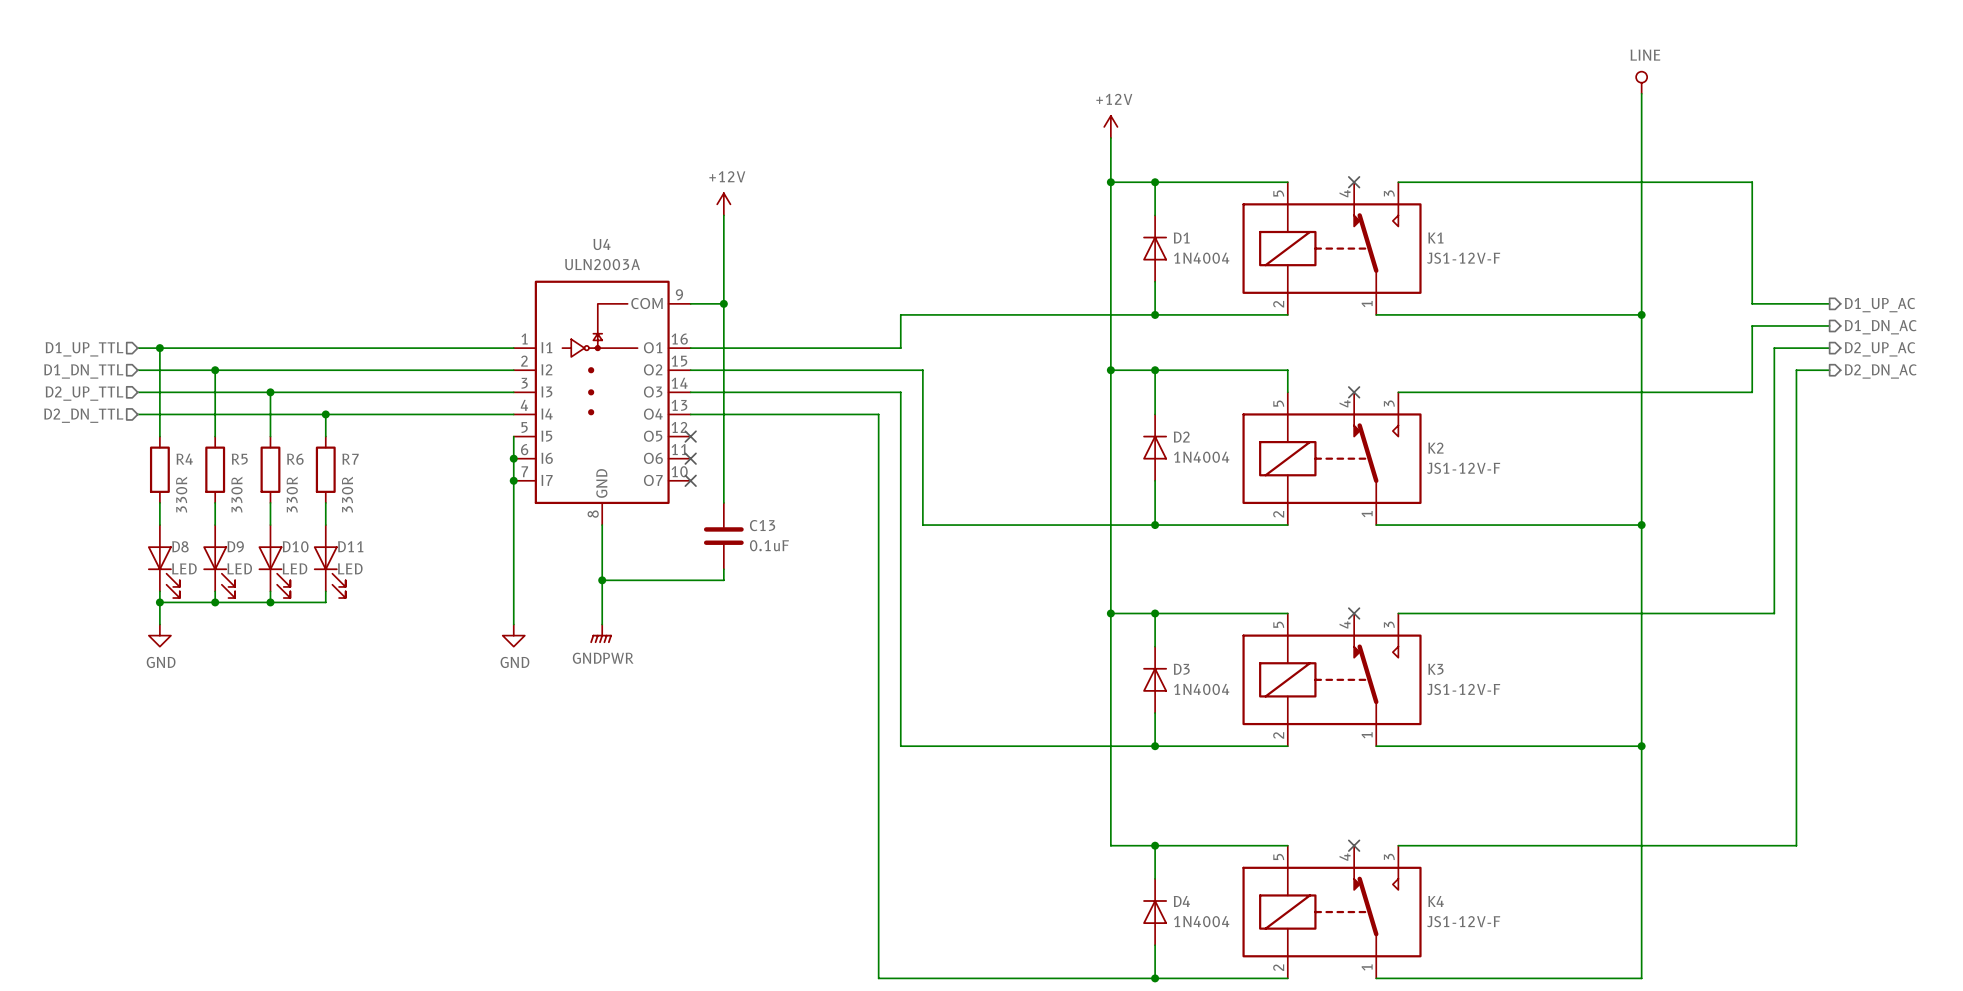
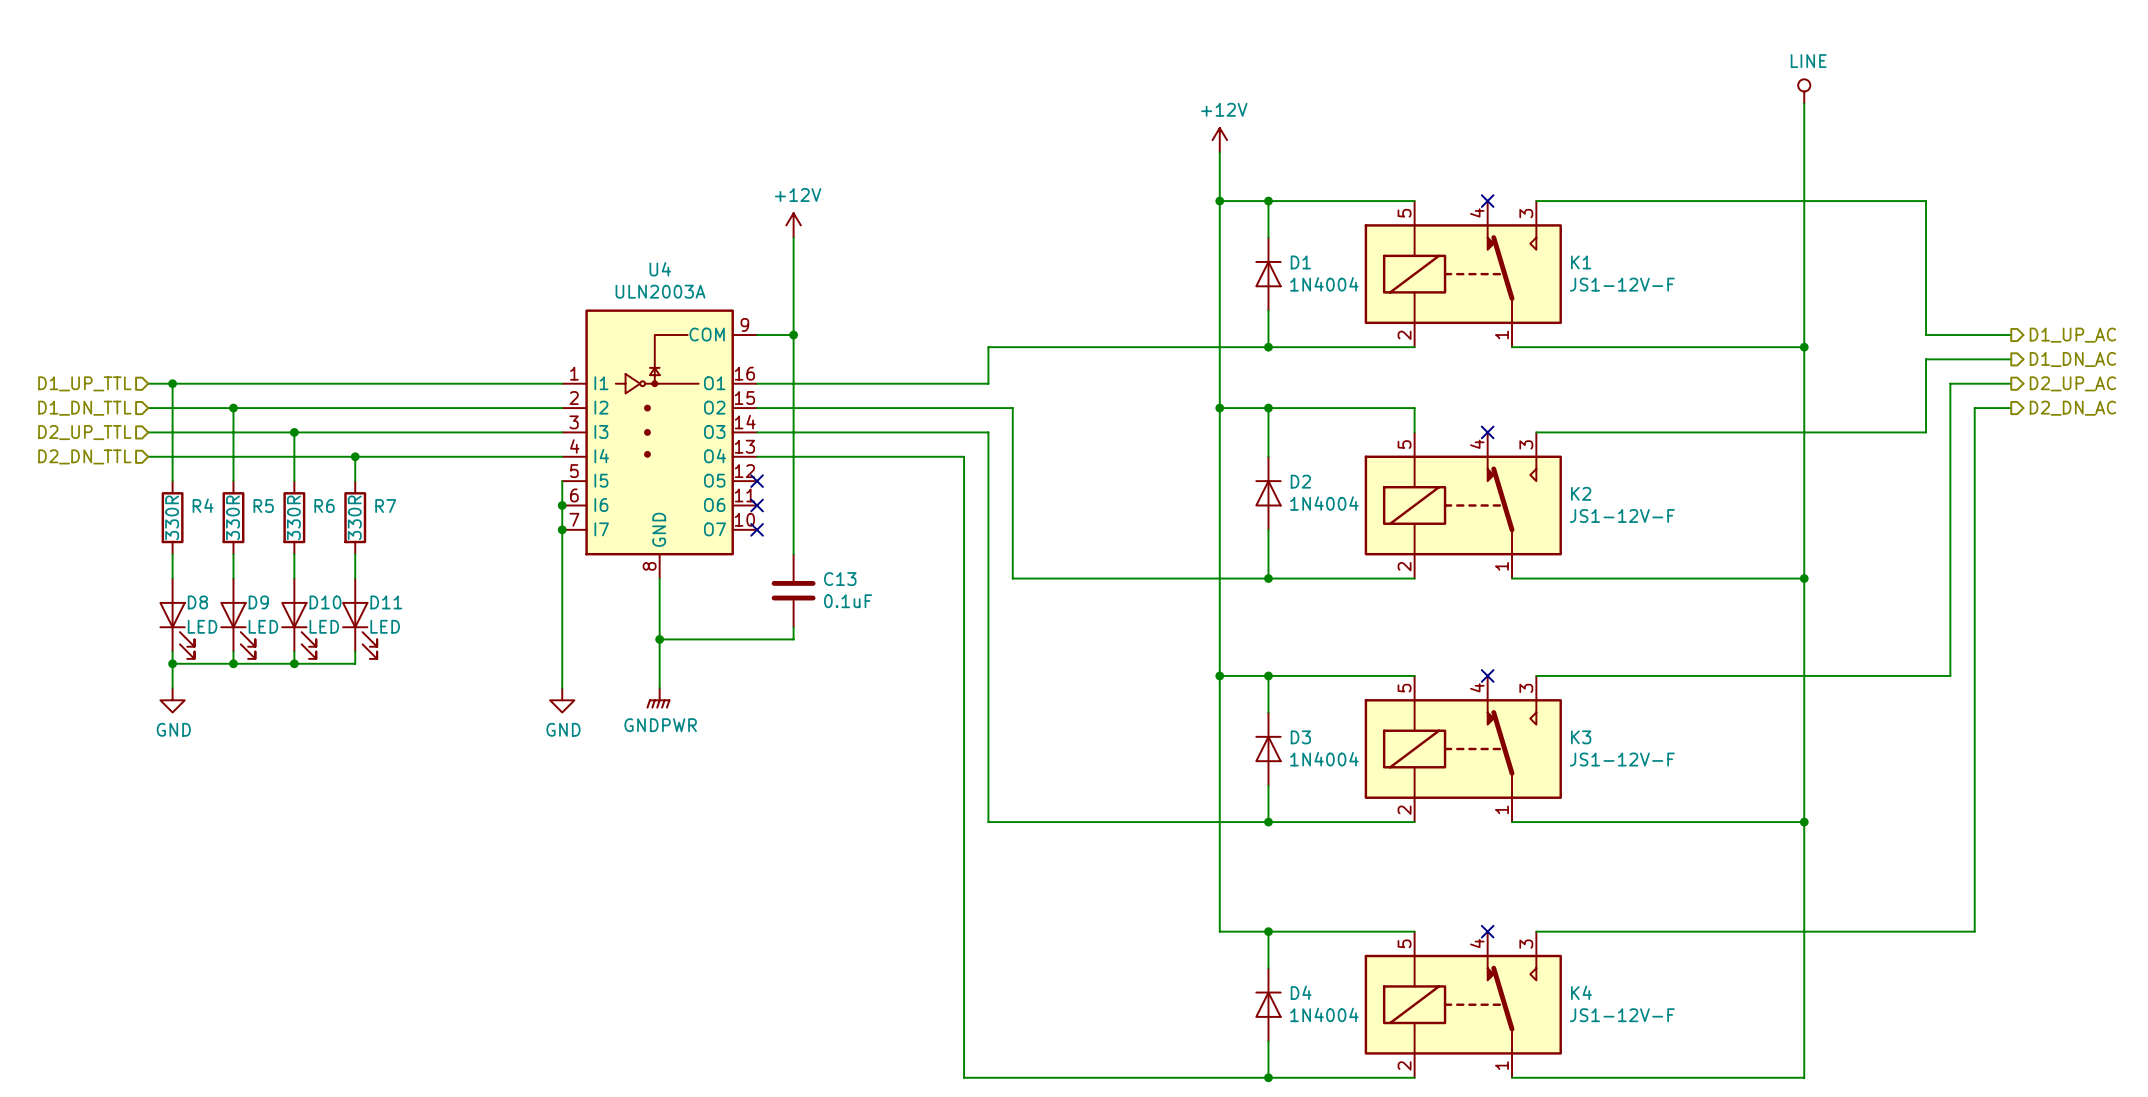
R4 value position: 330R (181, 494) -> 330R (172, 517)
R5 value position: 330R (236, 494) -> 330R (233, 517)
R6 value position: 330R (292, 494) -> 330R (293, 517)
R7 value position: 330R (347, 494) -> 330R (354, 517)

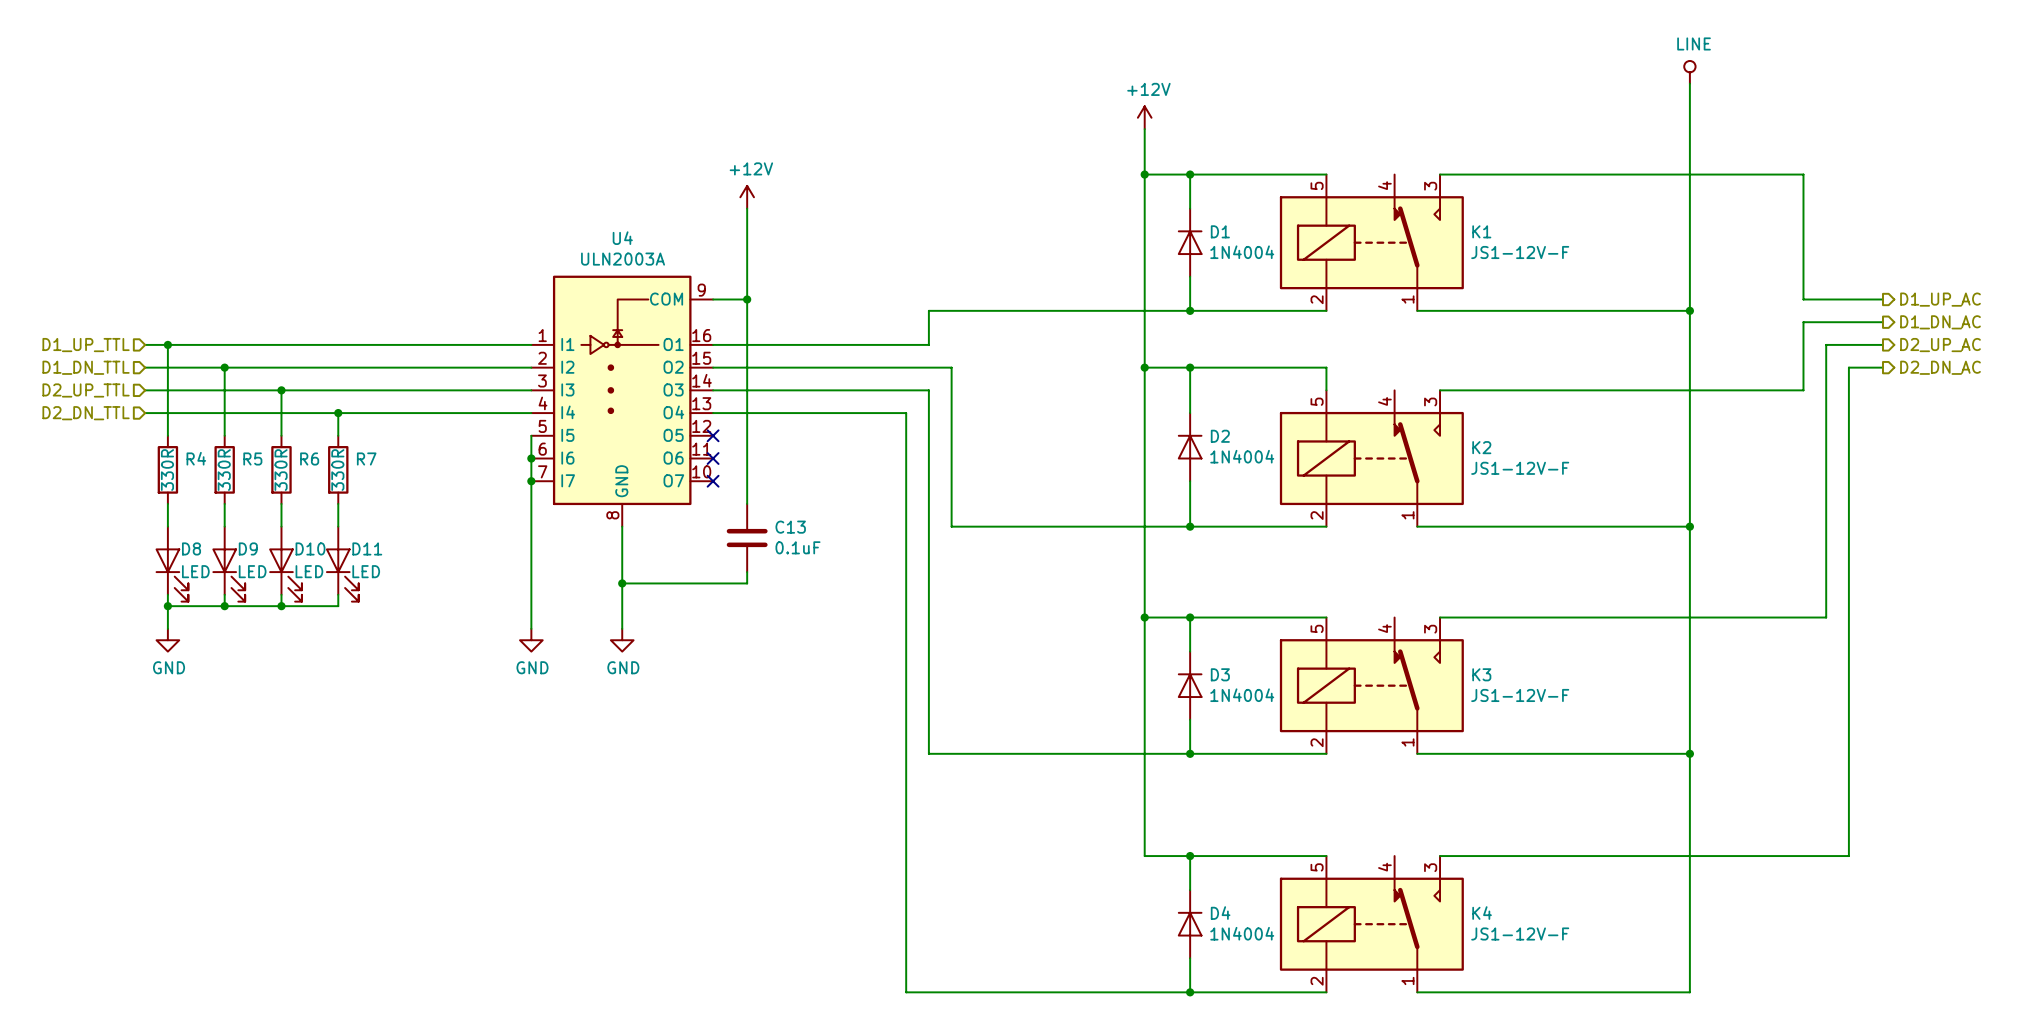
no-connect mark: (1487, 201) -> none
no-connect mark: (1487, 432) -> none
no-connect mark: (1487, 675) -> none
power symbol: GNDPWR (658, 698) -> GND (622, 640)
no-connect mark: (1487, 931) -> none

